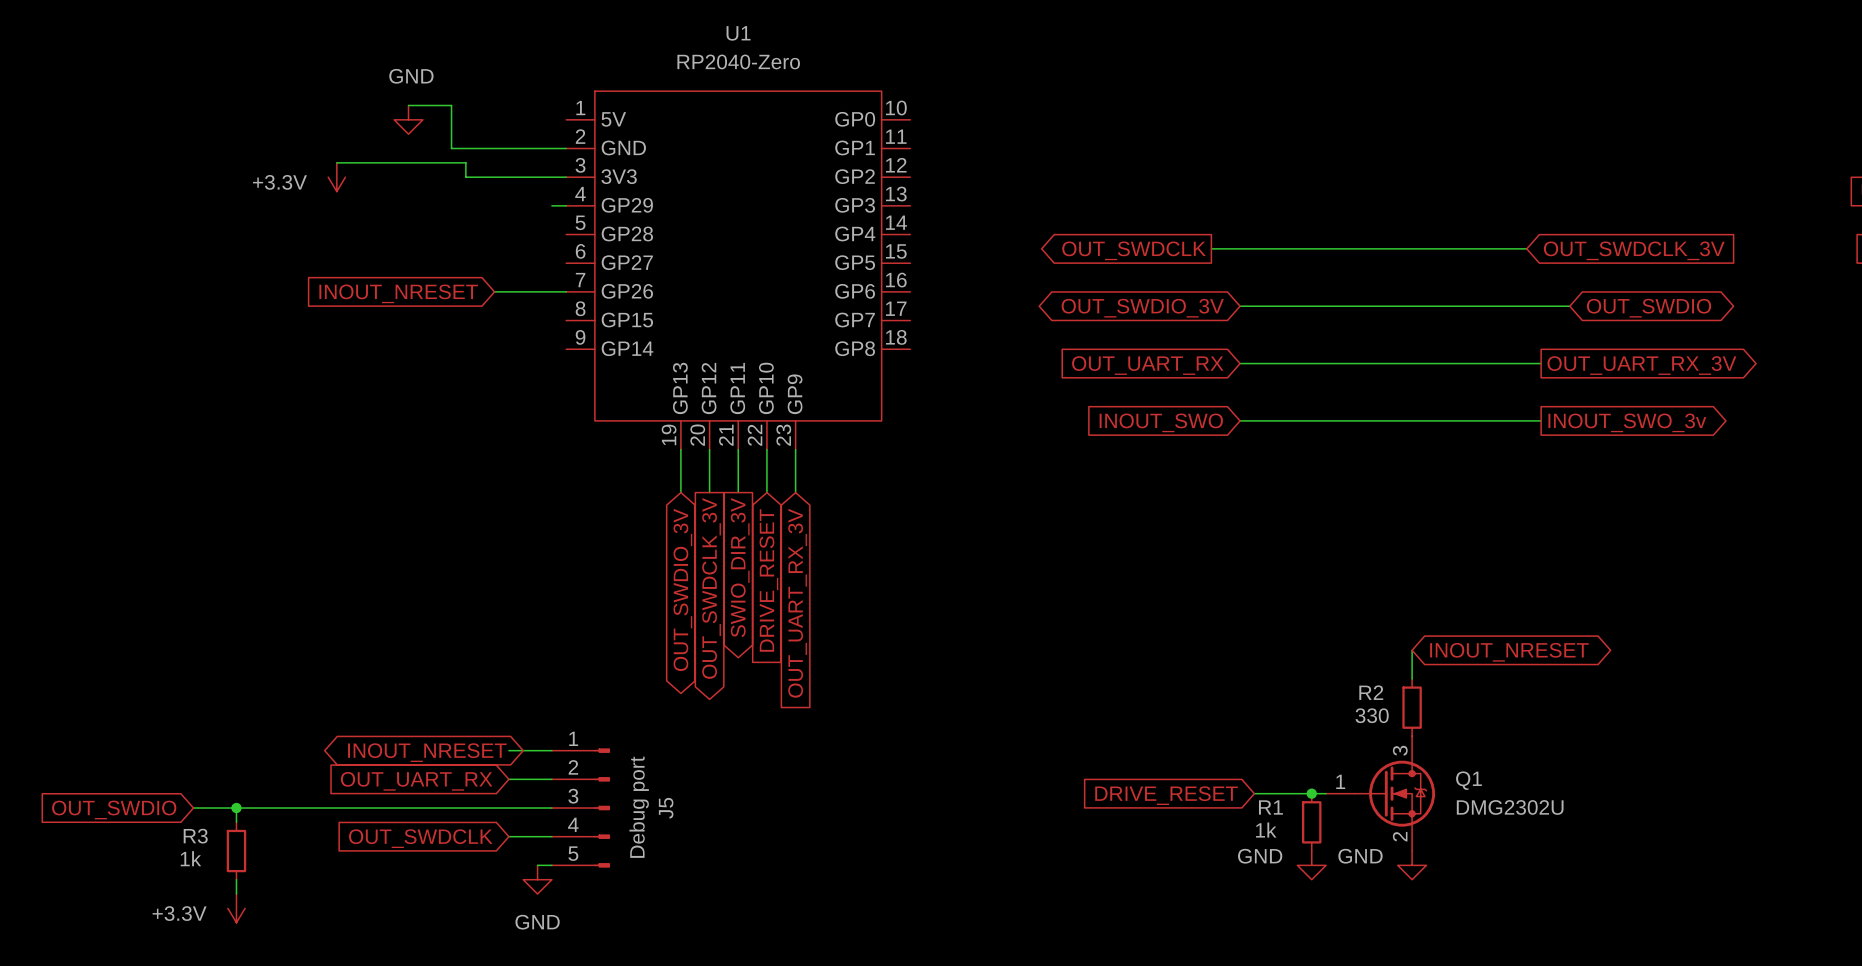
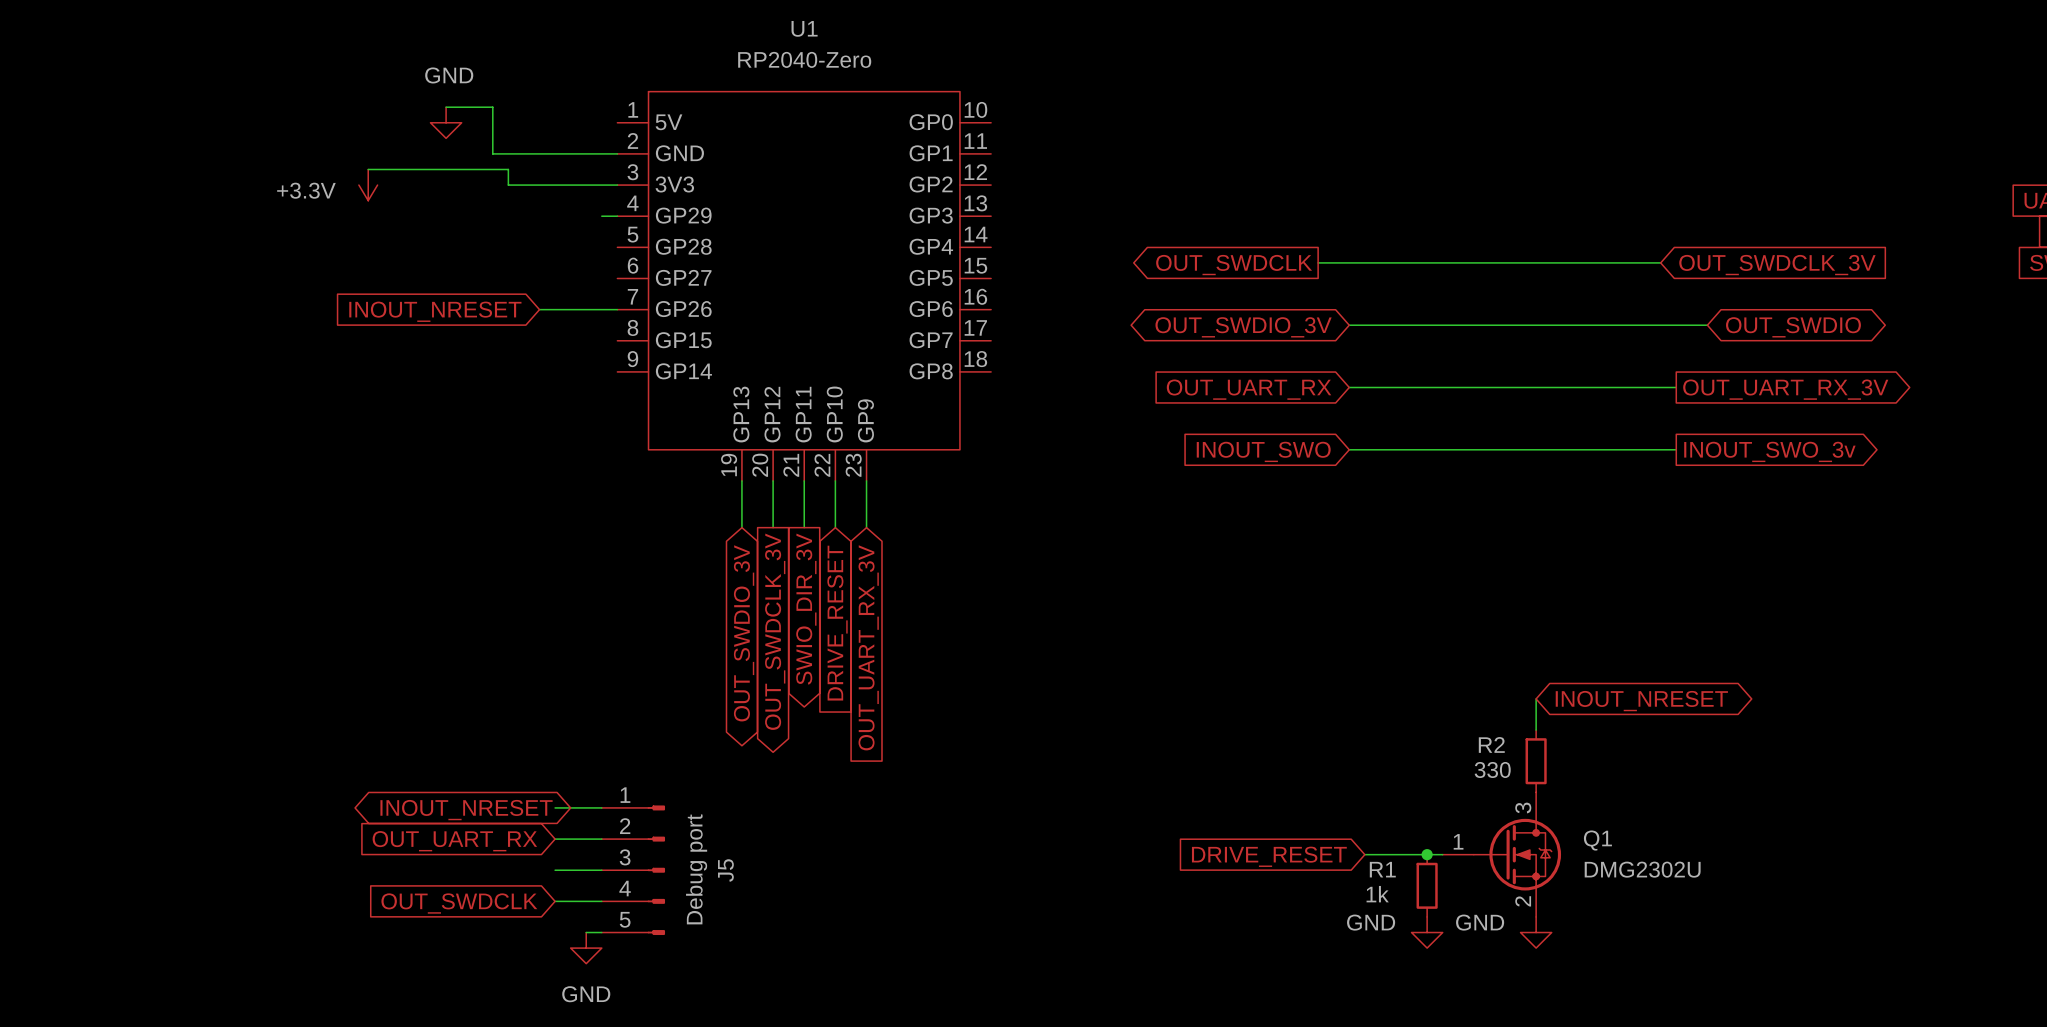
wire: (193, 808) (508, 808) -> none
wire: (236, 808) (236, 822) -> none
junction: (236, 808) -> none
global label: OUT_SWDIO (114, 809) -> none
R3: 1k (236, 851) -> none
wire: (236, 879) (236, 894) -> none
power symbol: +3.3V (236, 908) -> none

